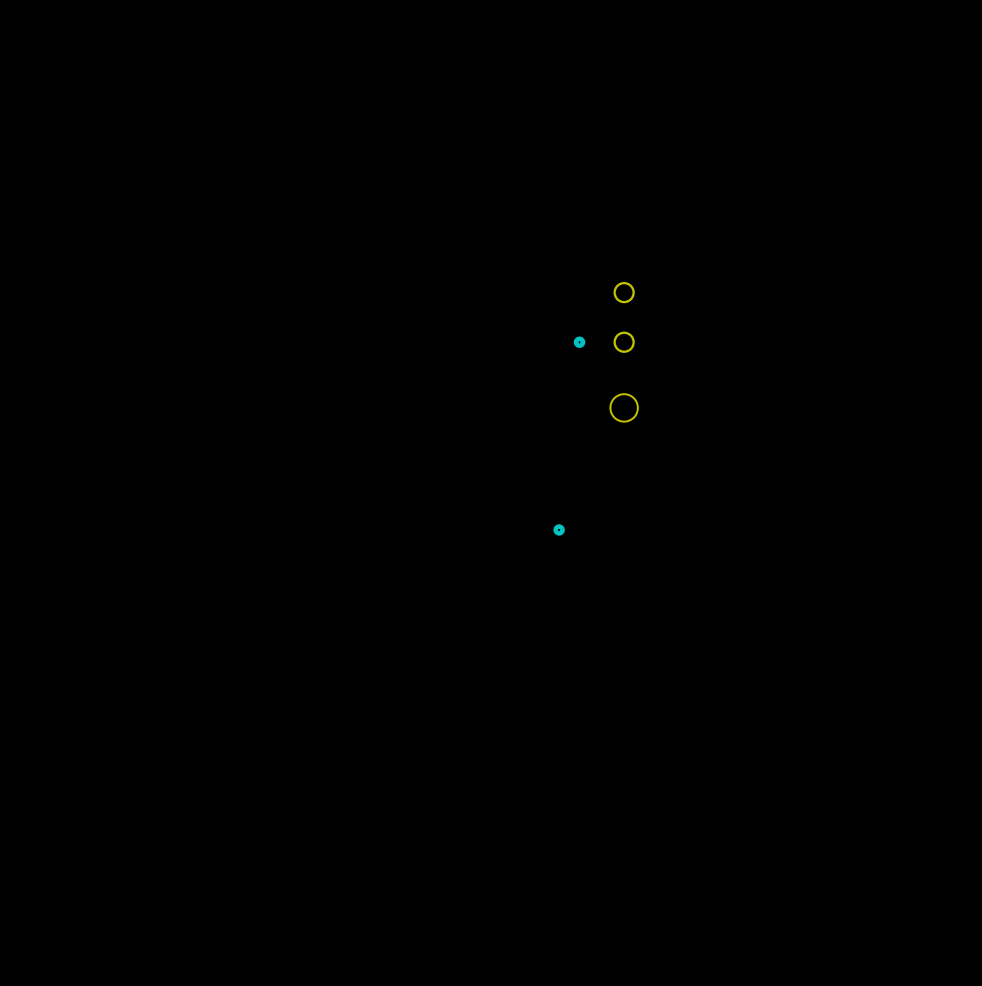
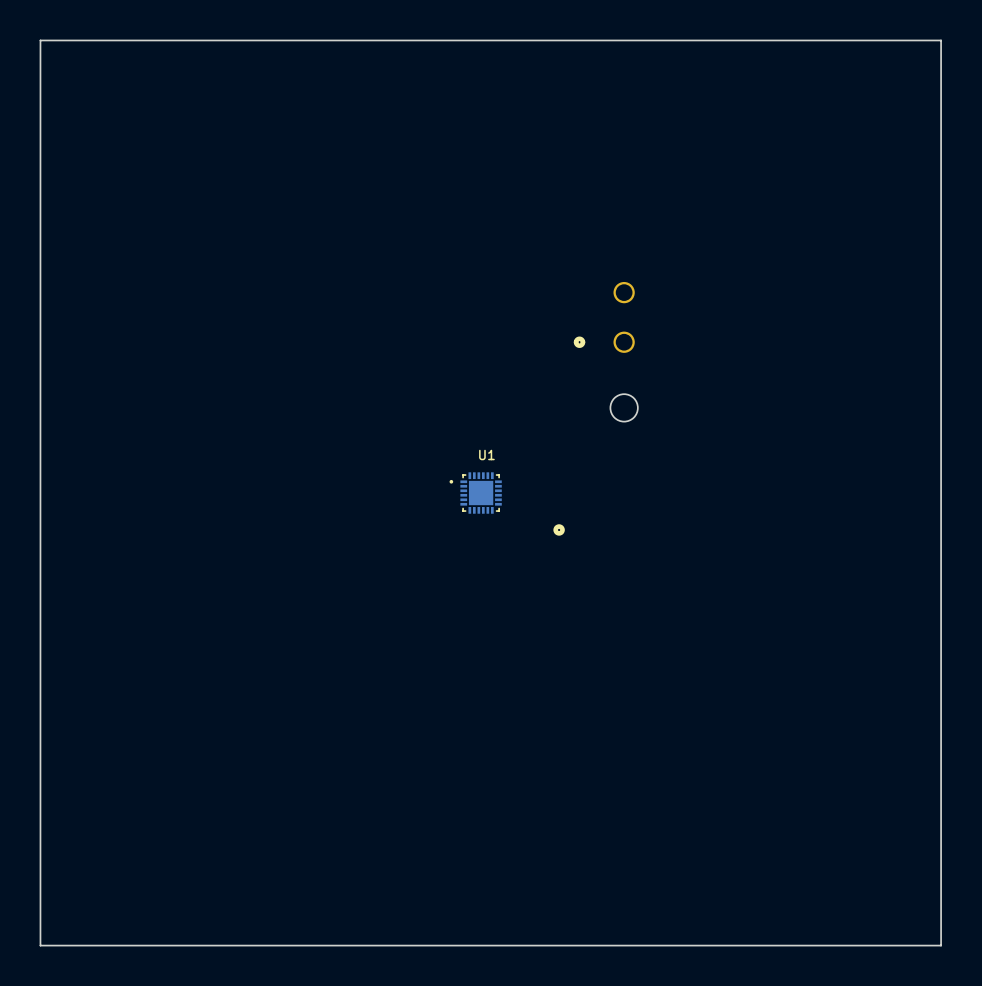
board edge: none -> (941, 40) (40, 40) (40, 945) (941, 945) (941, 40)
U1: none -> (475, 493)

